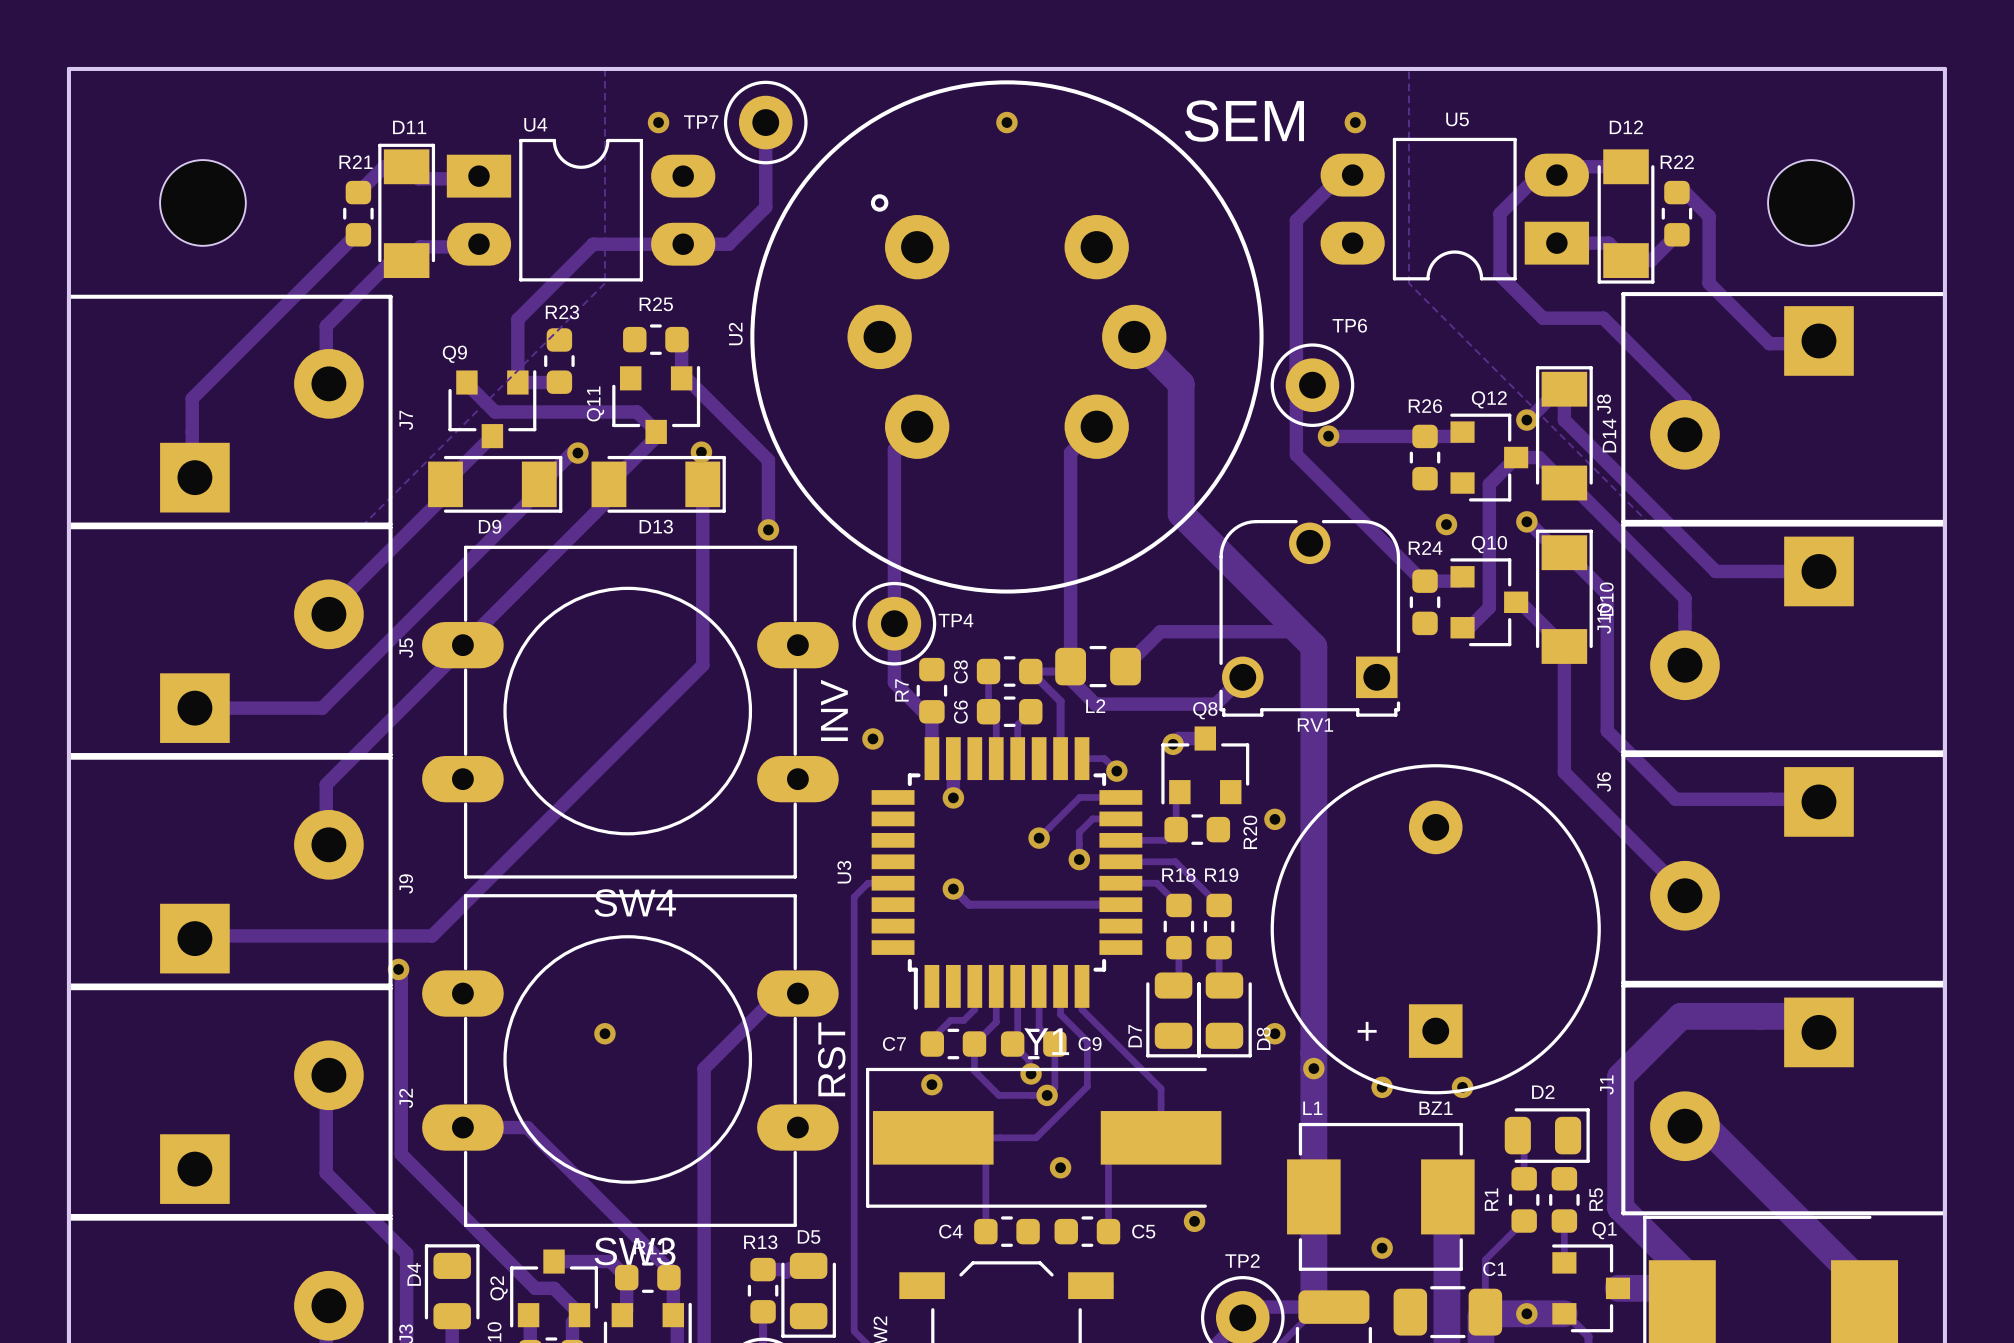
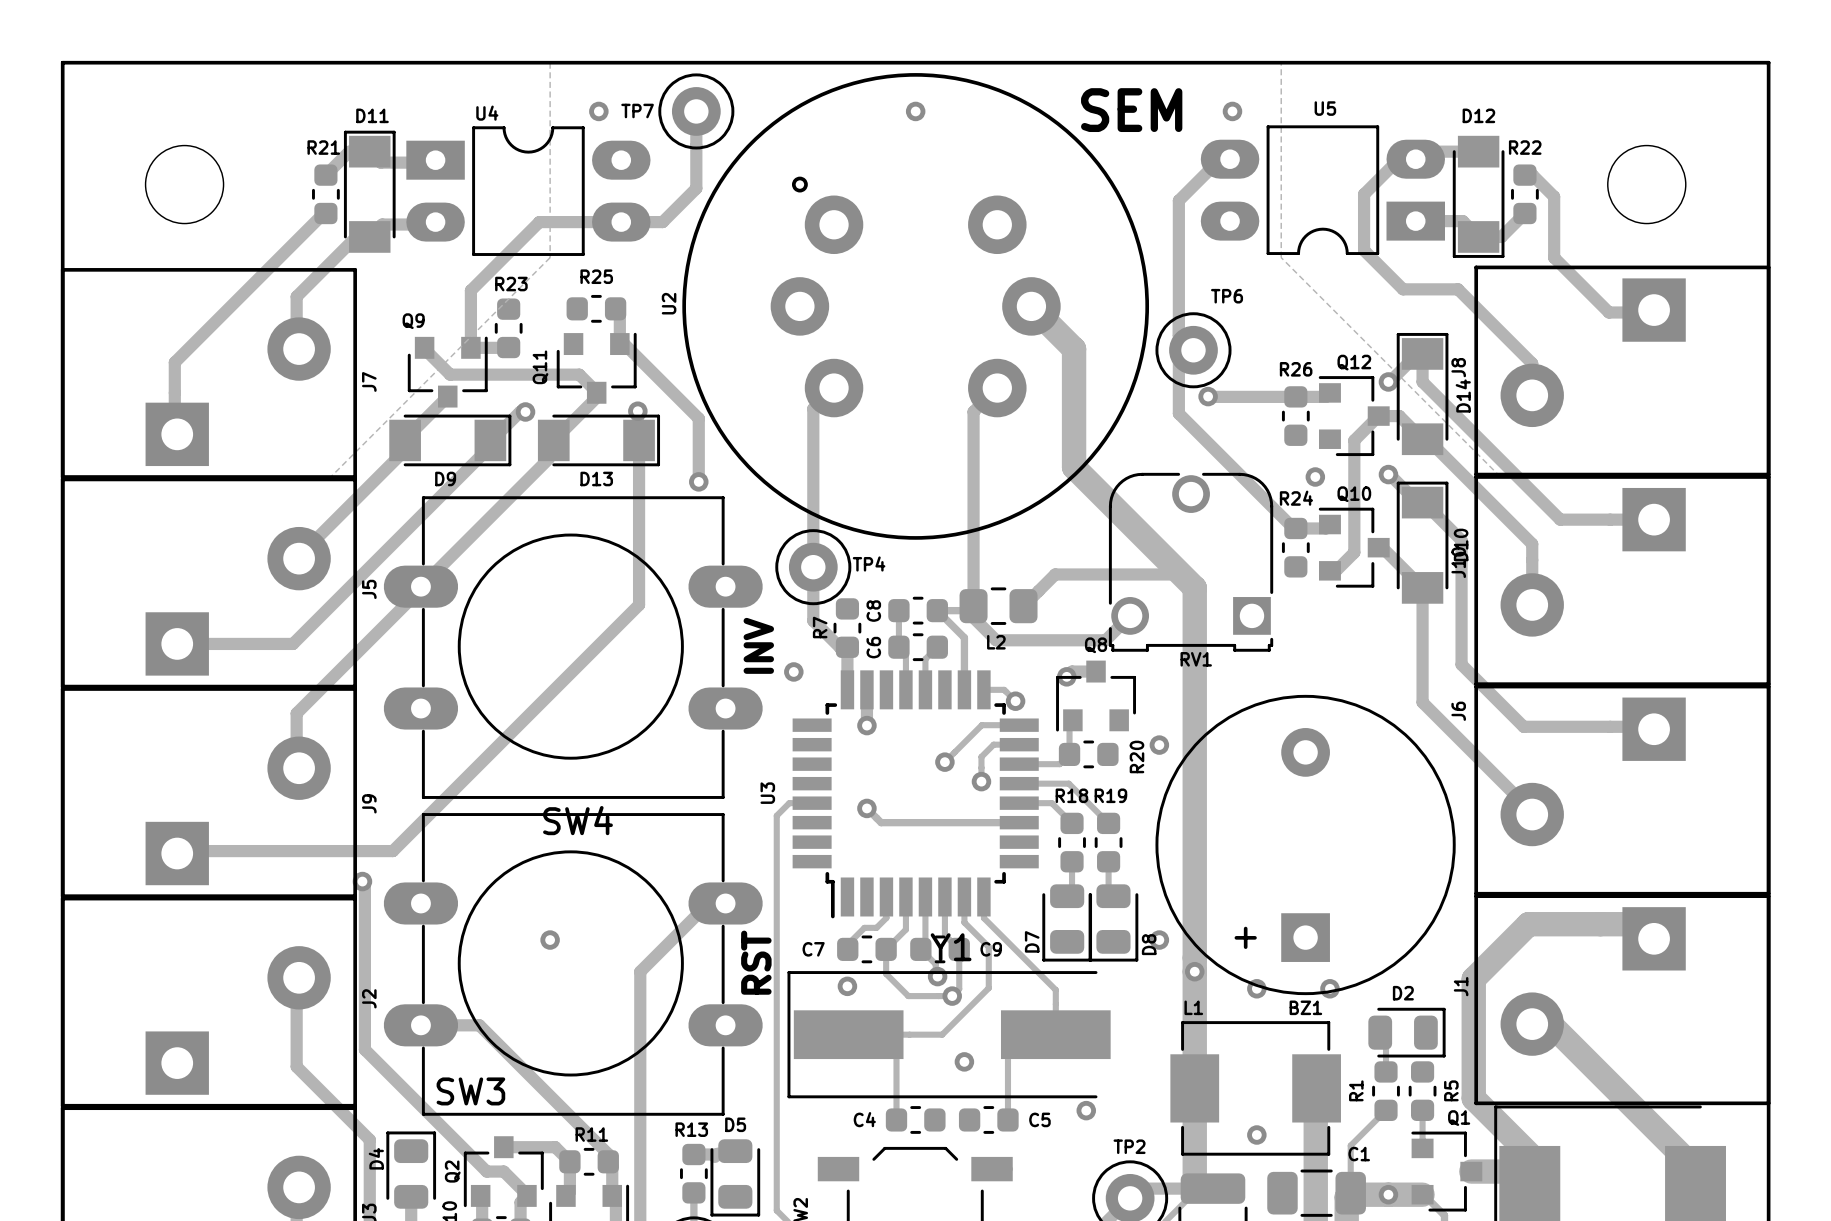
SW3 name position: SW3 (635, 1251) -> SW3 (470, 1091)

